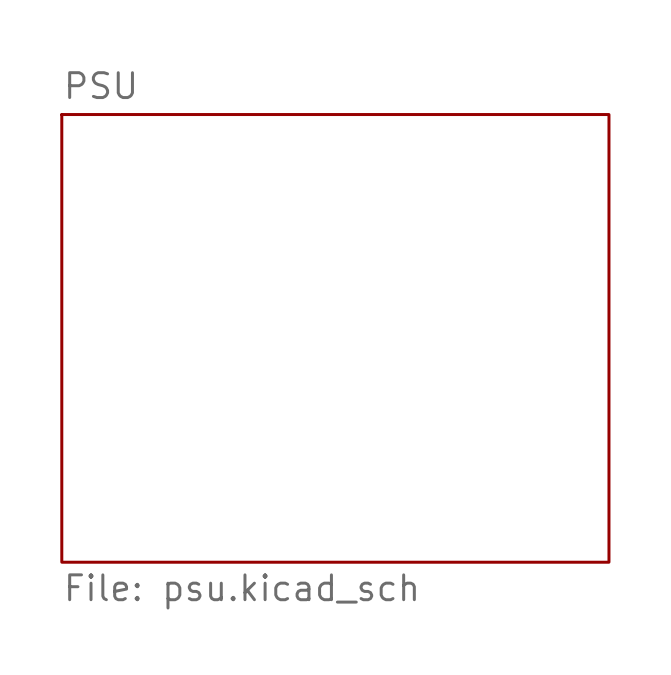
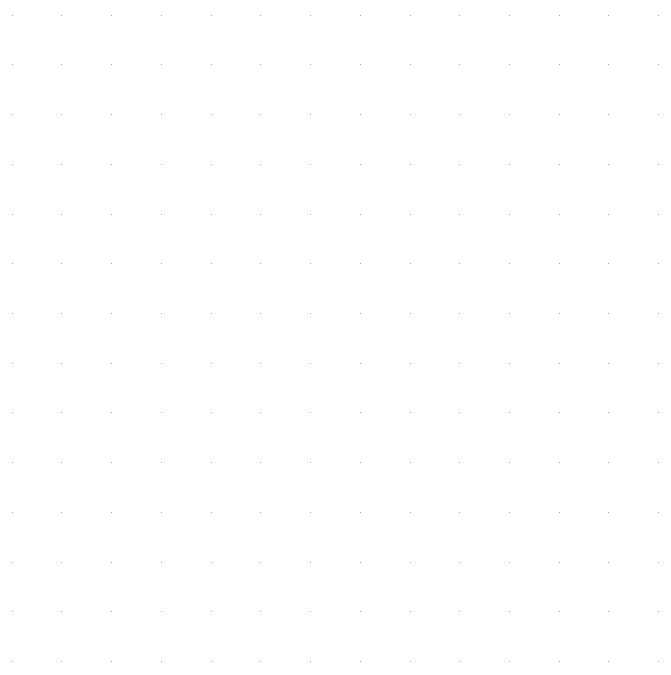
sheet PSU: File: psu.kicad_sch (335, 338) -> none

